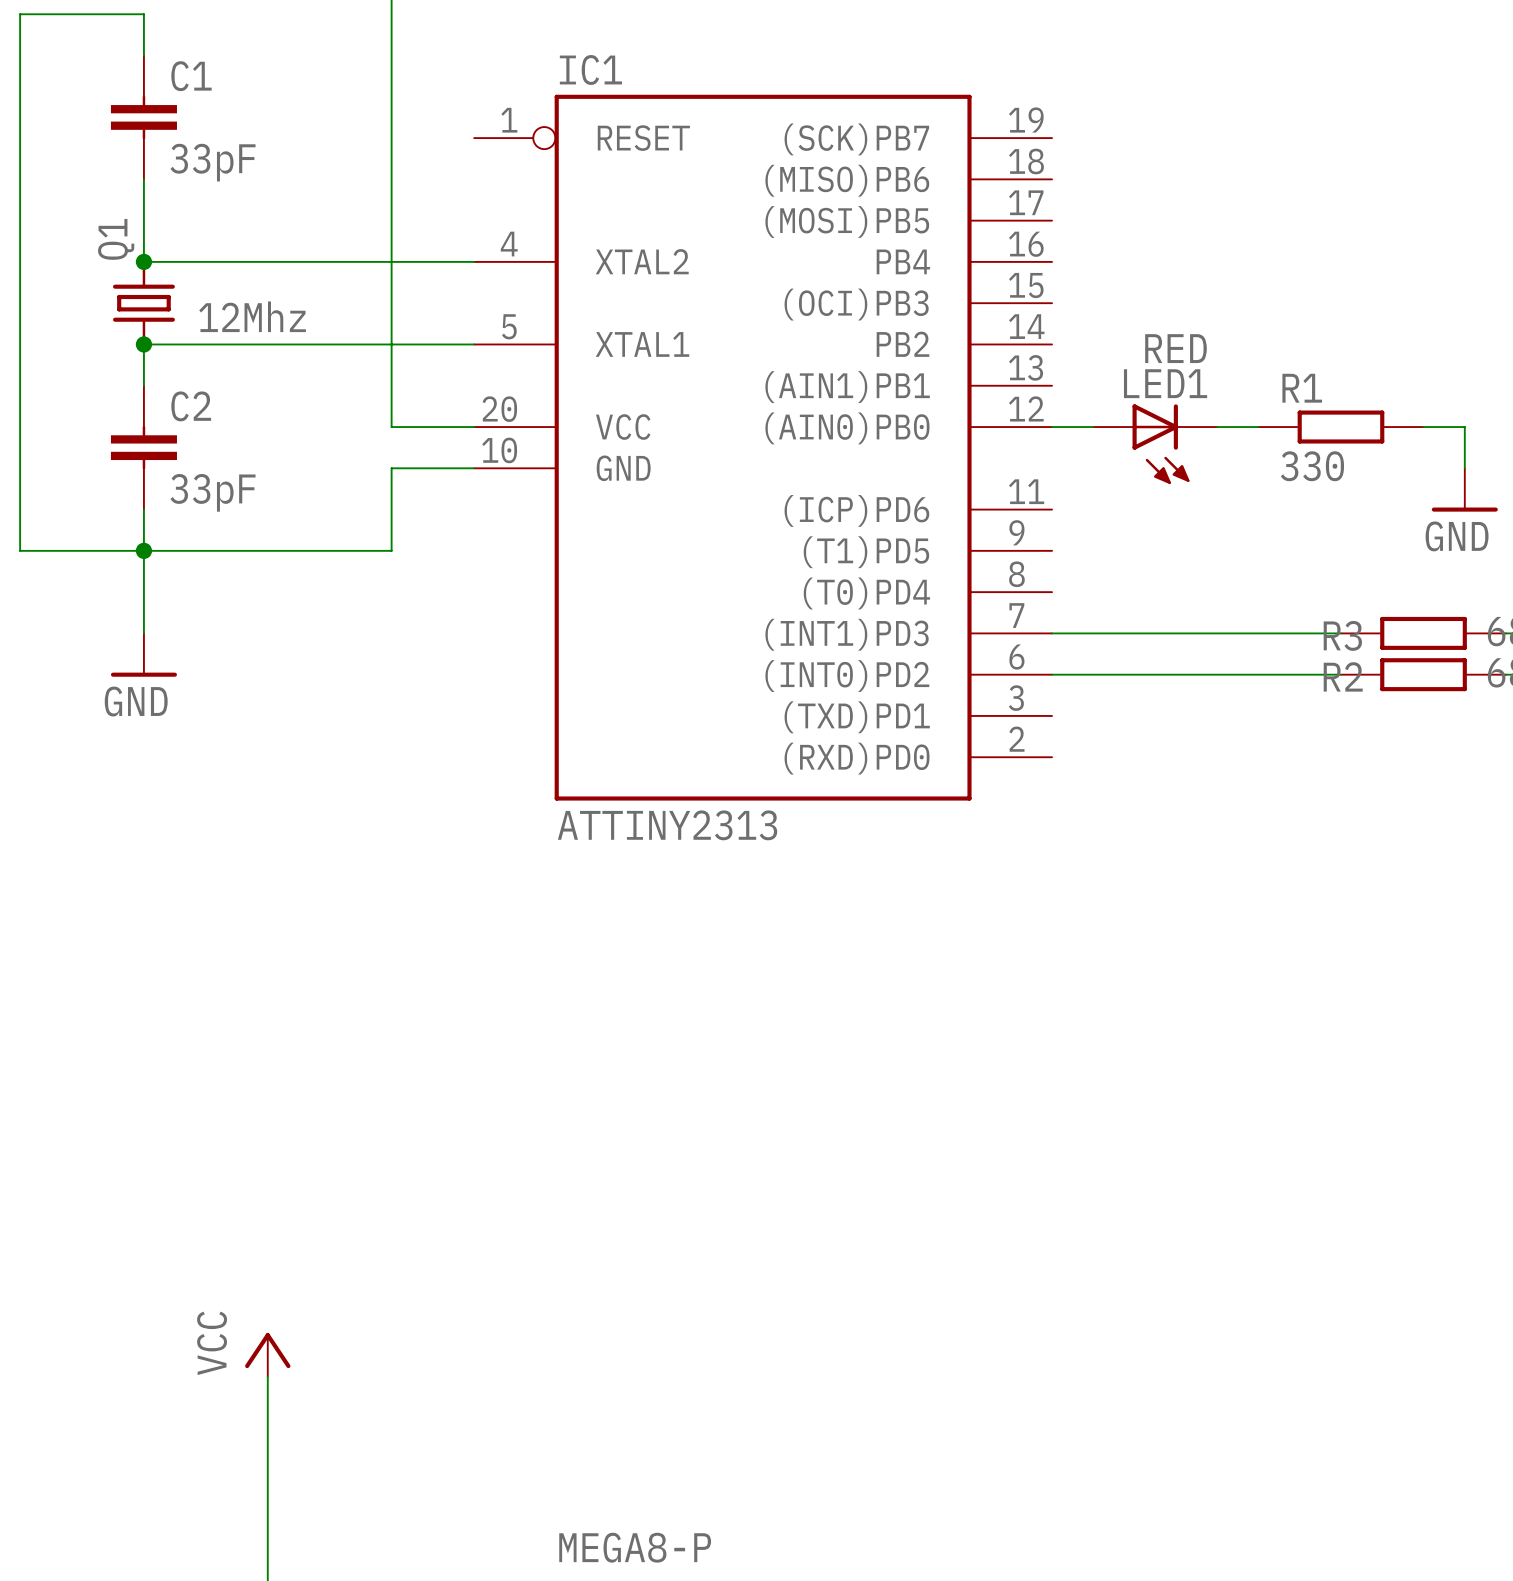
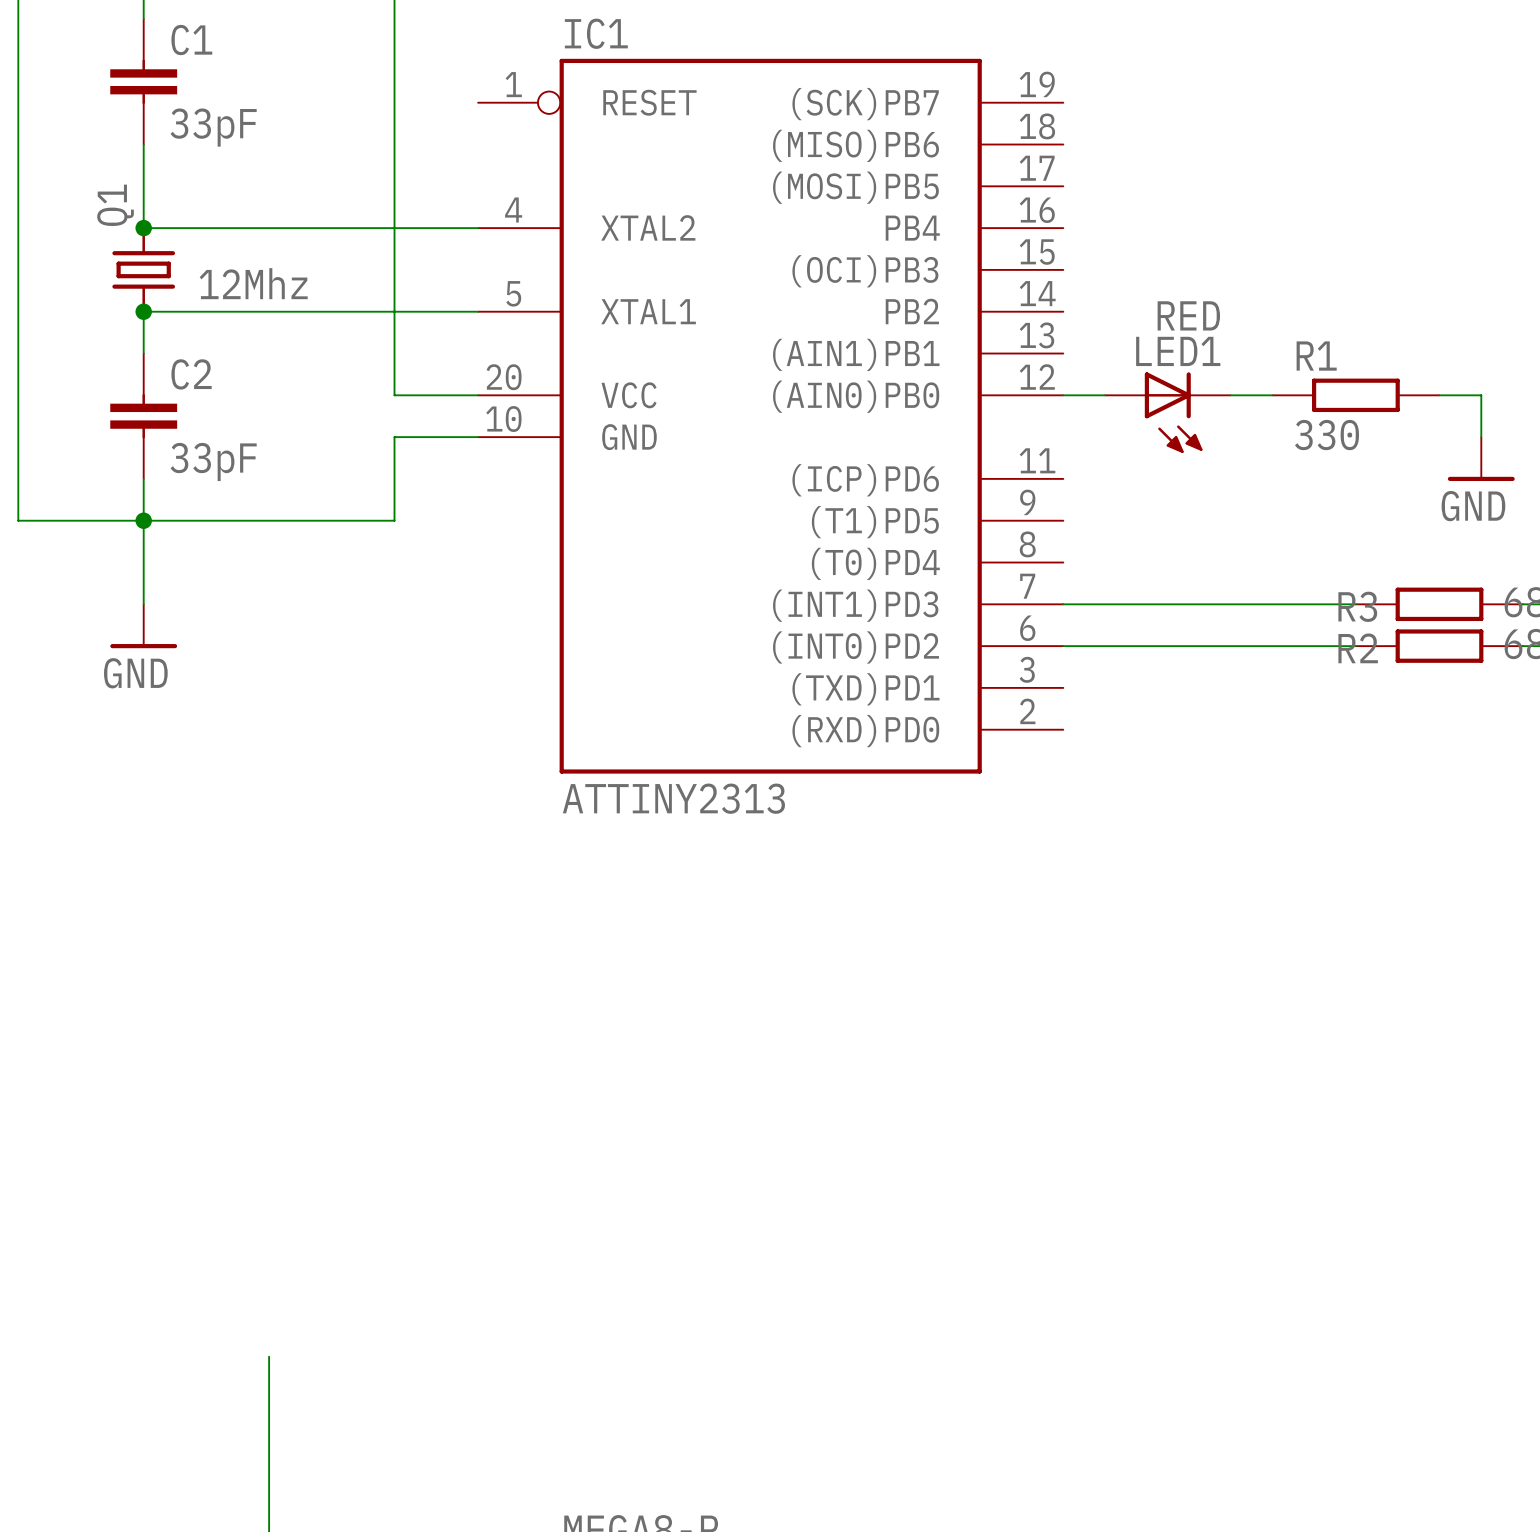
power symbol: VCC (267, 1354) -> none

